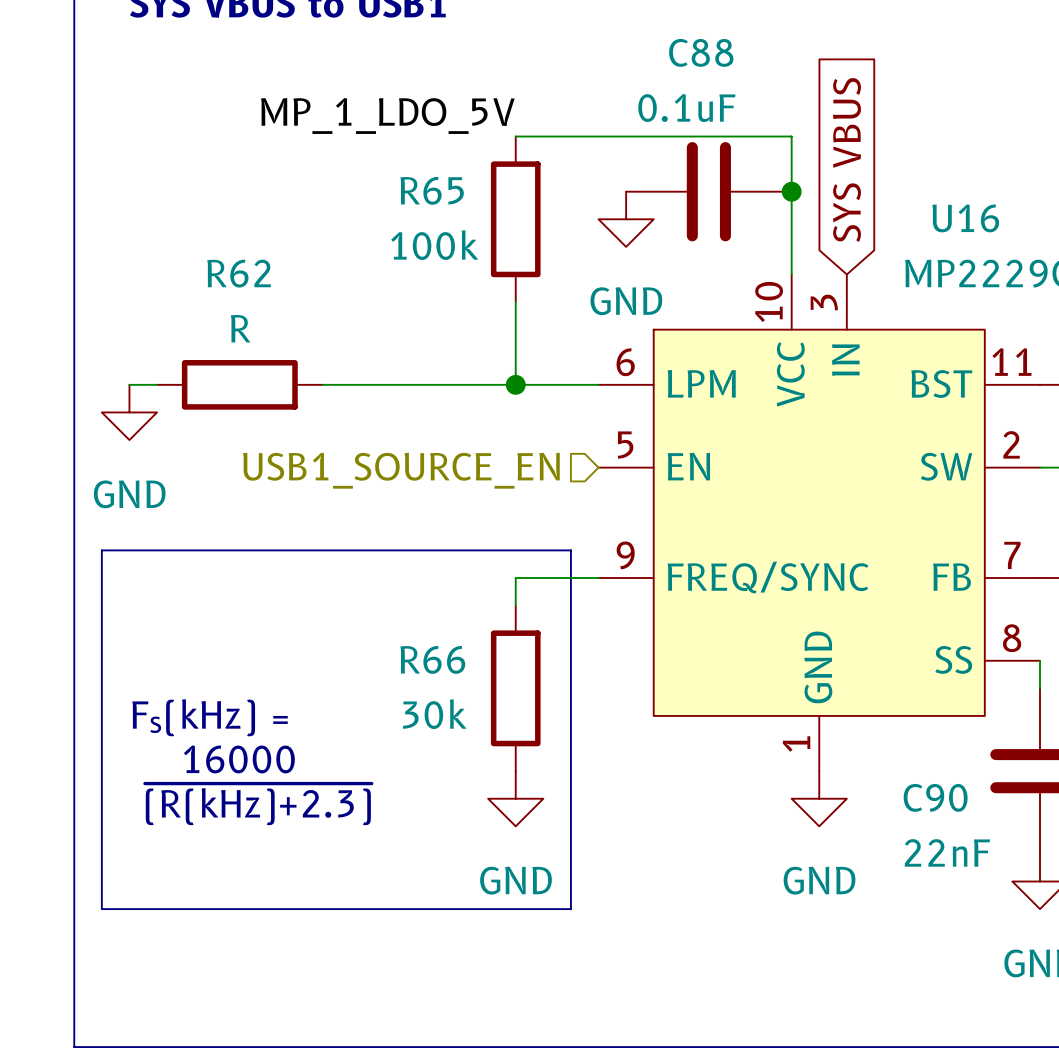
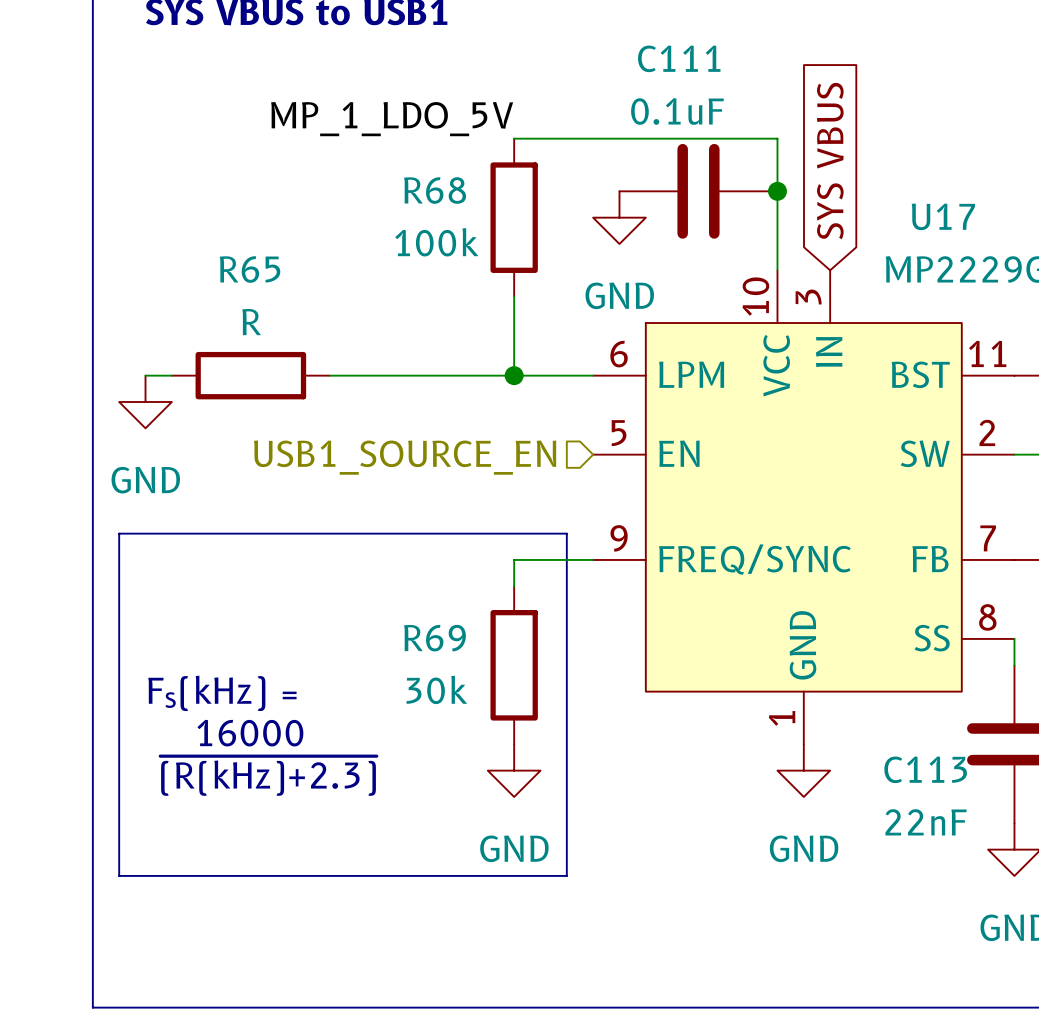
C88 name: C88 (701, 52) -> C111 (679, 58)
R65 name: R65 (432, 190) -> R68 (435, 190)
U16 name: U16 (965, 218) -> U17 (943, 216)
R62 name: R62 (239, 273) -> R65 (250, 269)
R66 name: R66 (432, 659) -> R69 (434, 638)
C90 name: C90 (935, 797) -> C113 (925, 769)

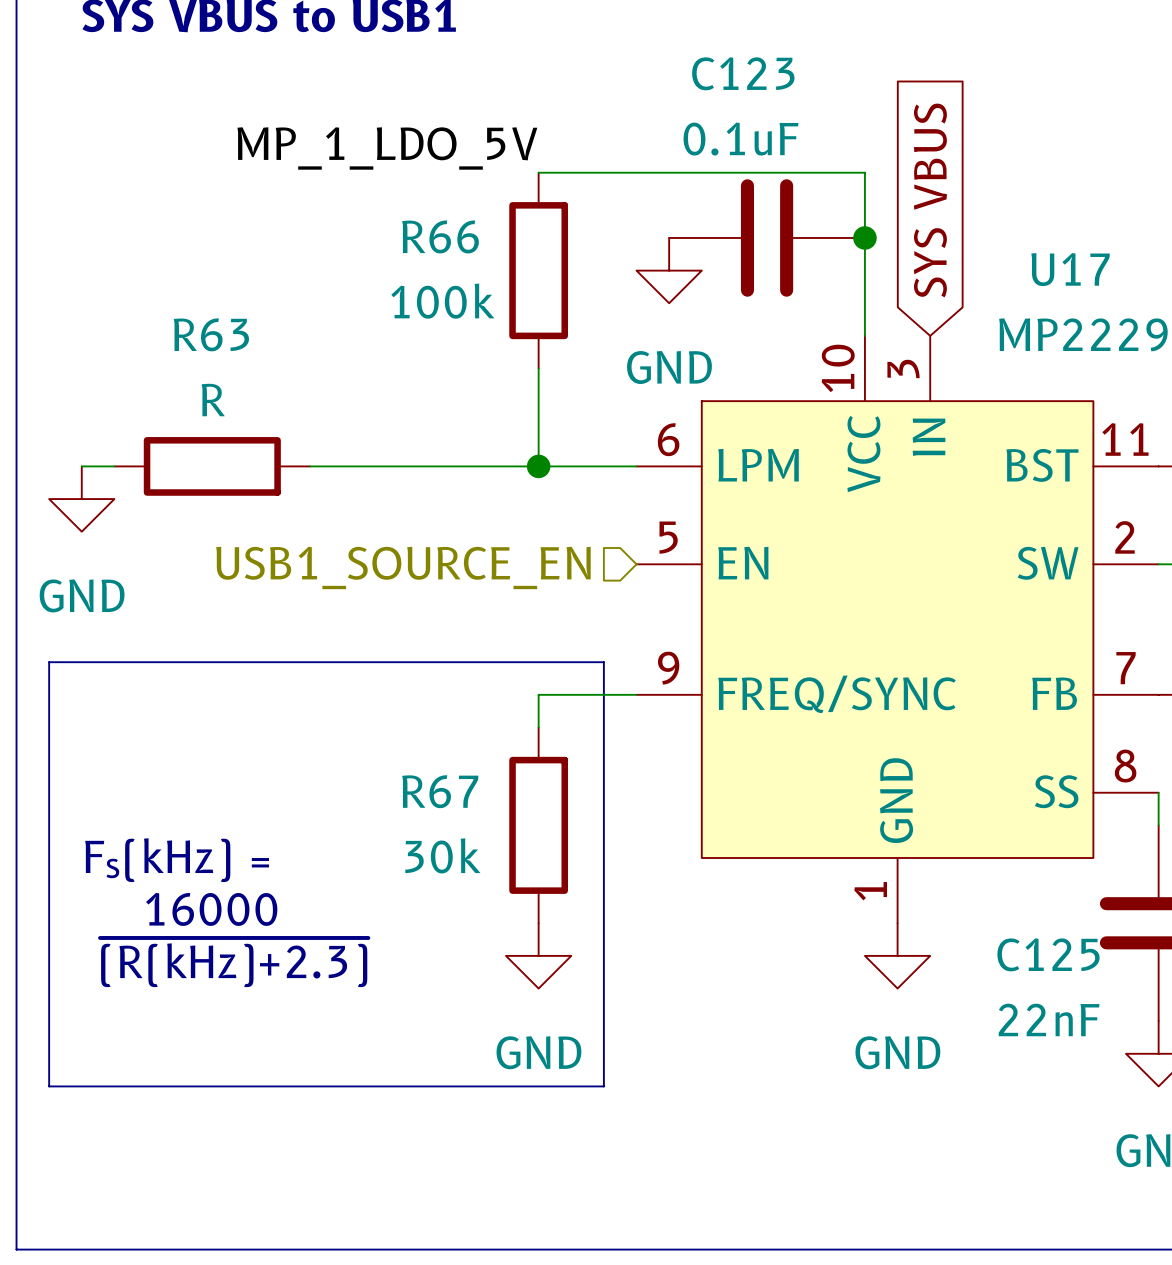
C111 name: C111 (679, 58) -> C123 (743, 73)
R68 name: R68 (435, 190) -> R66 (440, 236)
R65 name: R65 (250, 269) -> R63 (211, 334)
R69 name: R69 (434, 638) -> R67 (440, 791)
C113 name: C113 (925, 769) -> C125 (1048, 954)

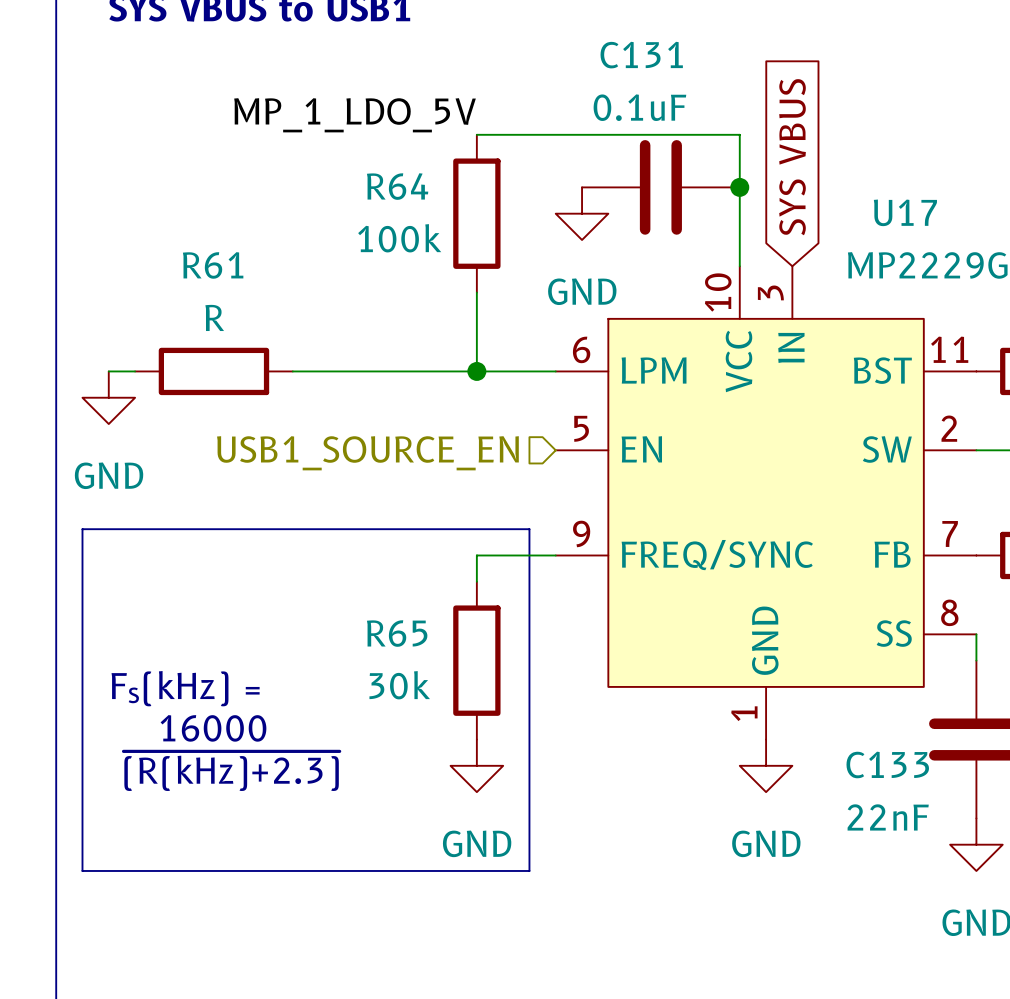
C123 name: C123 (743, 73) -> C131 (641, 55)
R66 name: R66 (440, 236) -> R64 (397, 186)
R63 name: R63 (211, 334) -> R61 (213, 265)
R67 name: R67 (440, 791) -> R65 (397, 633)
C125 name: C125 (1048, 954) -> C133 (887, 764)

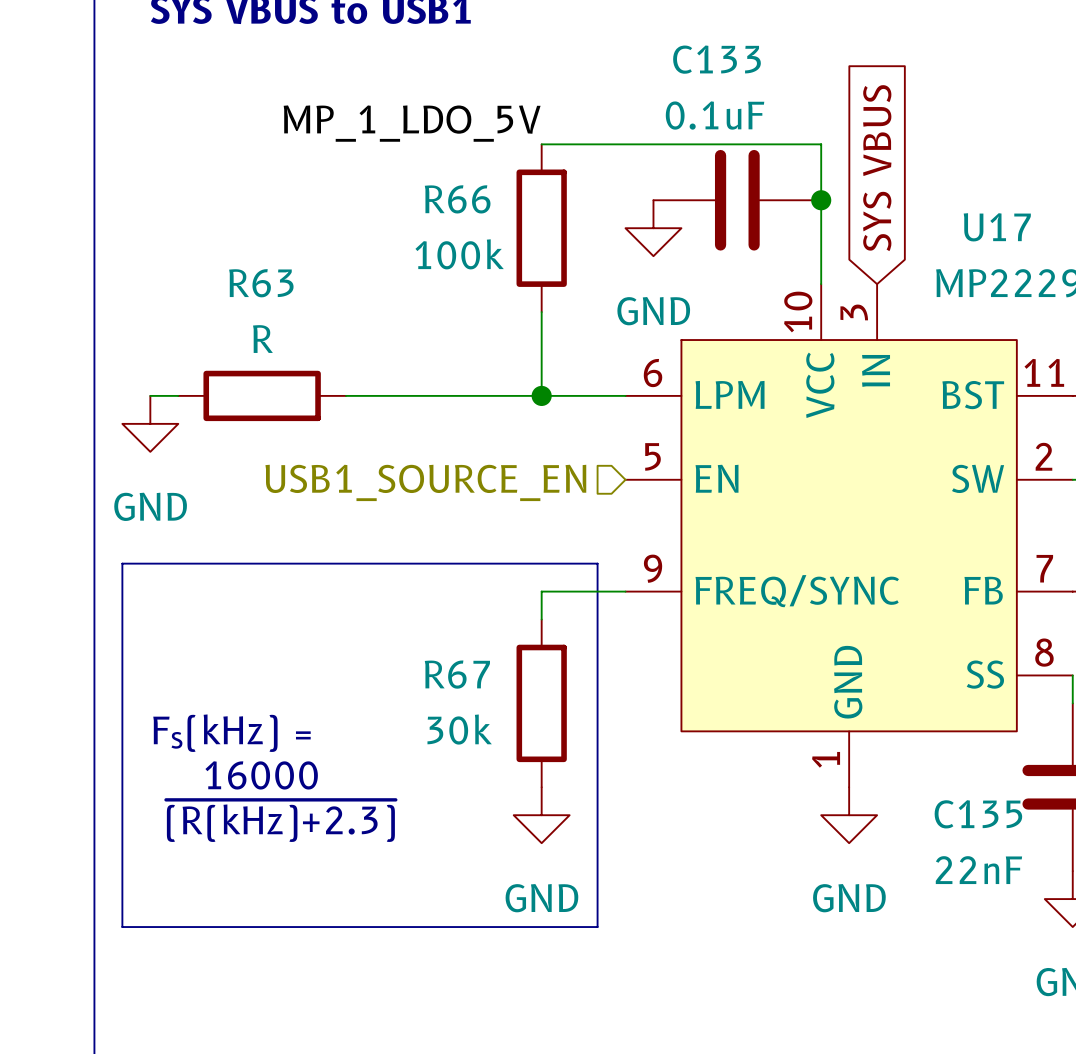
C131 name: C131 (641, 55) -> C133 (716, 59)
R64 name: R64 (397, 186) -> R66 (457, 199)
R61 name: R61 (213, 265) -> R63 (261, 283)
R65 name: R65 (397, 633) -> R67 (457, 674)
C133 name: C133 (887, 764) -> C135 (978, 814)

